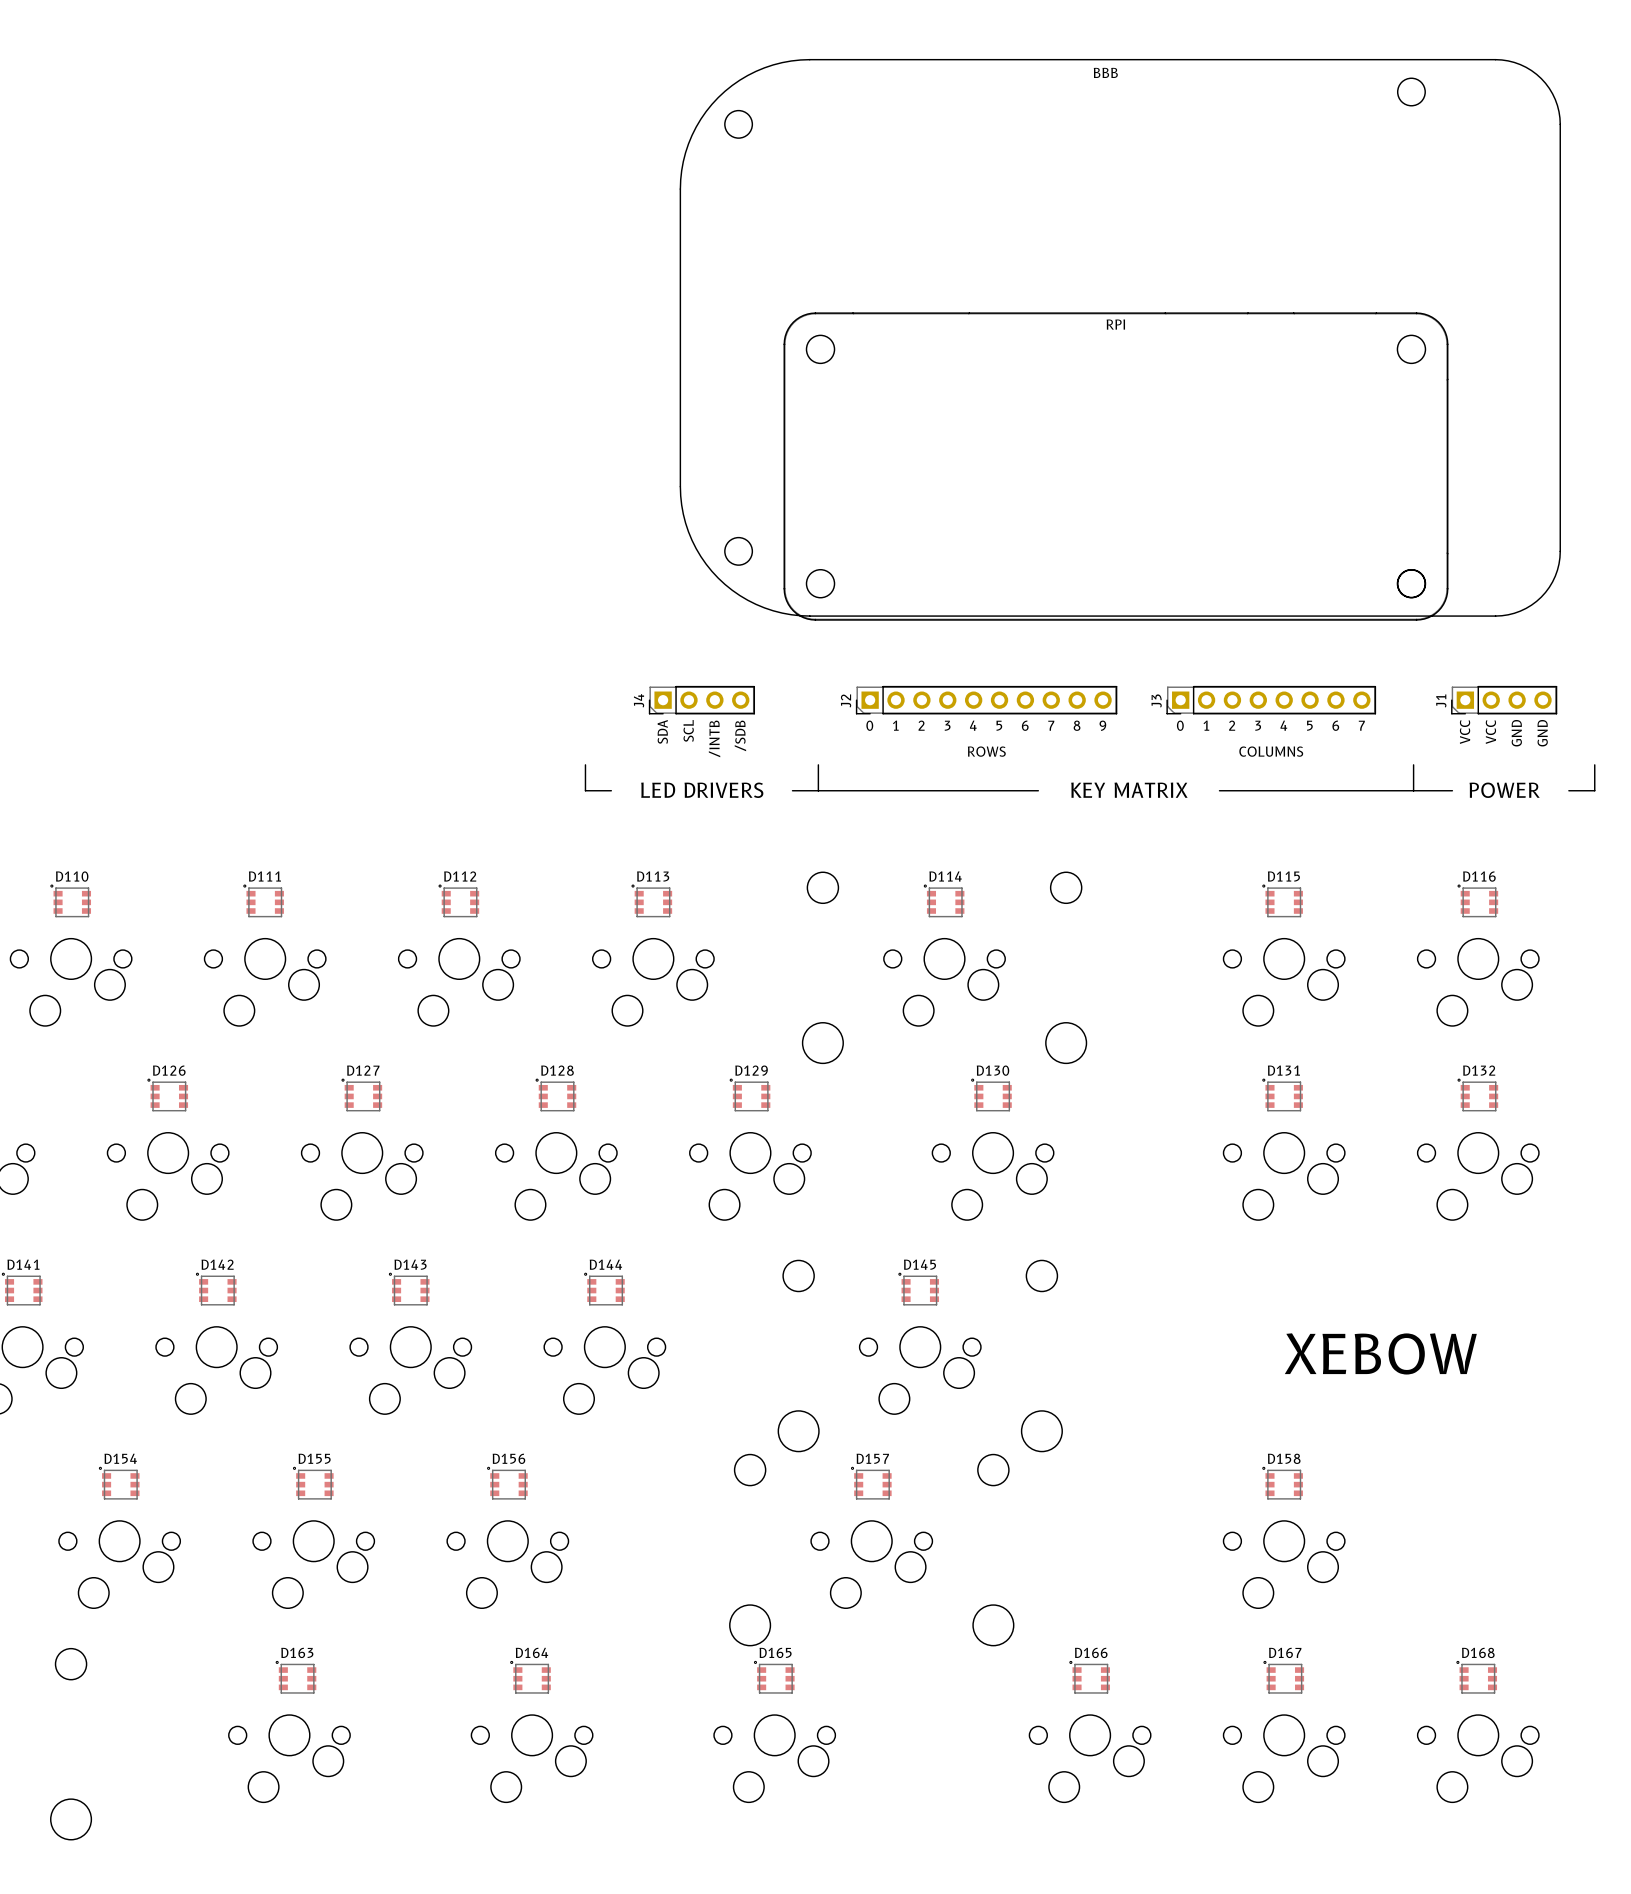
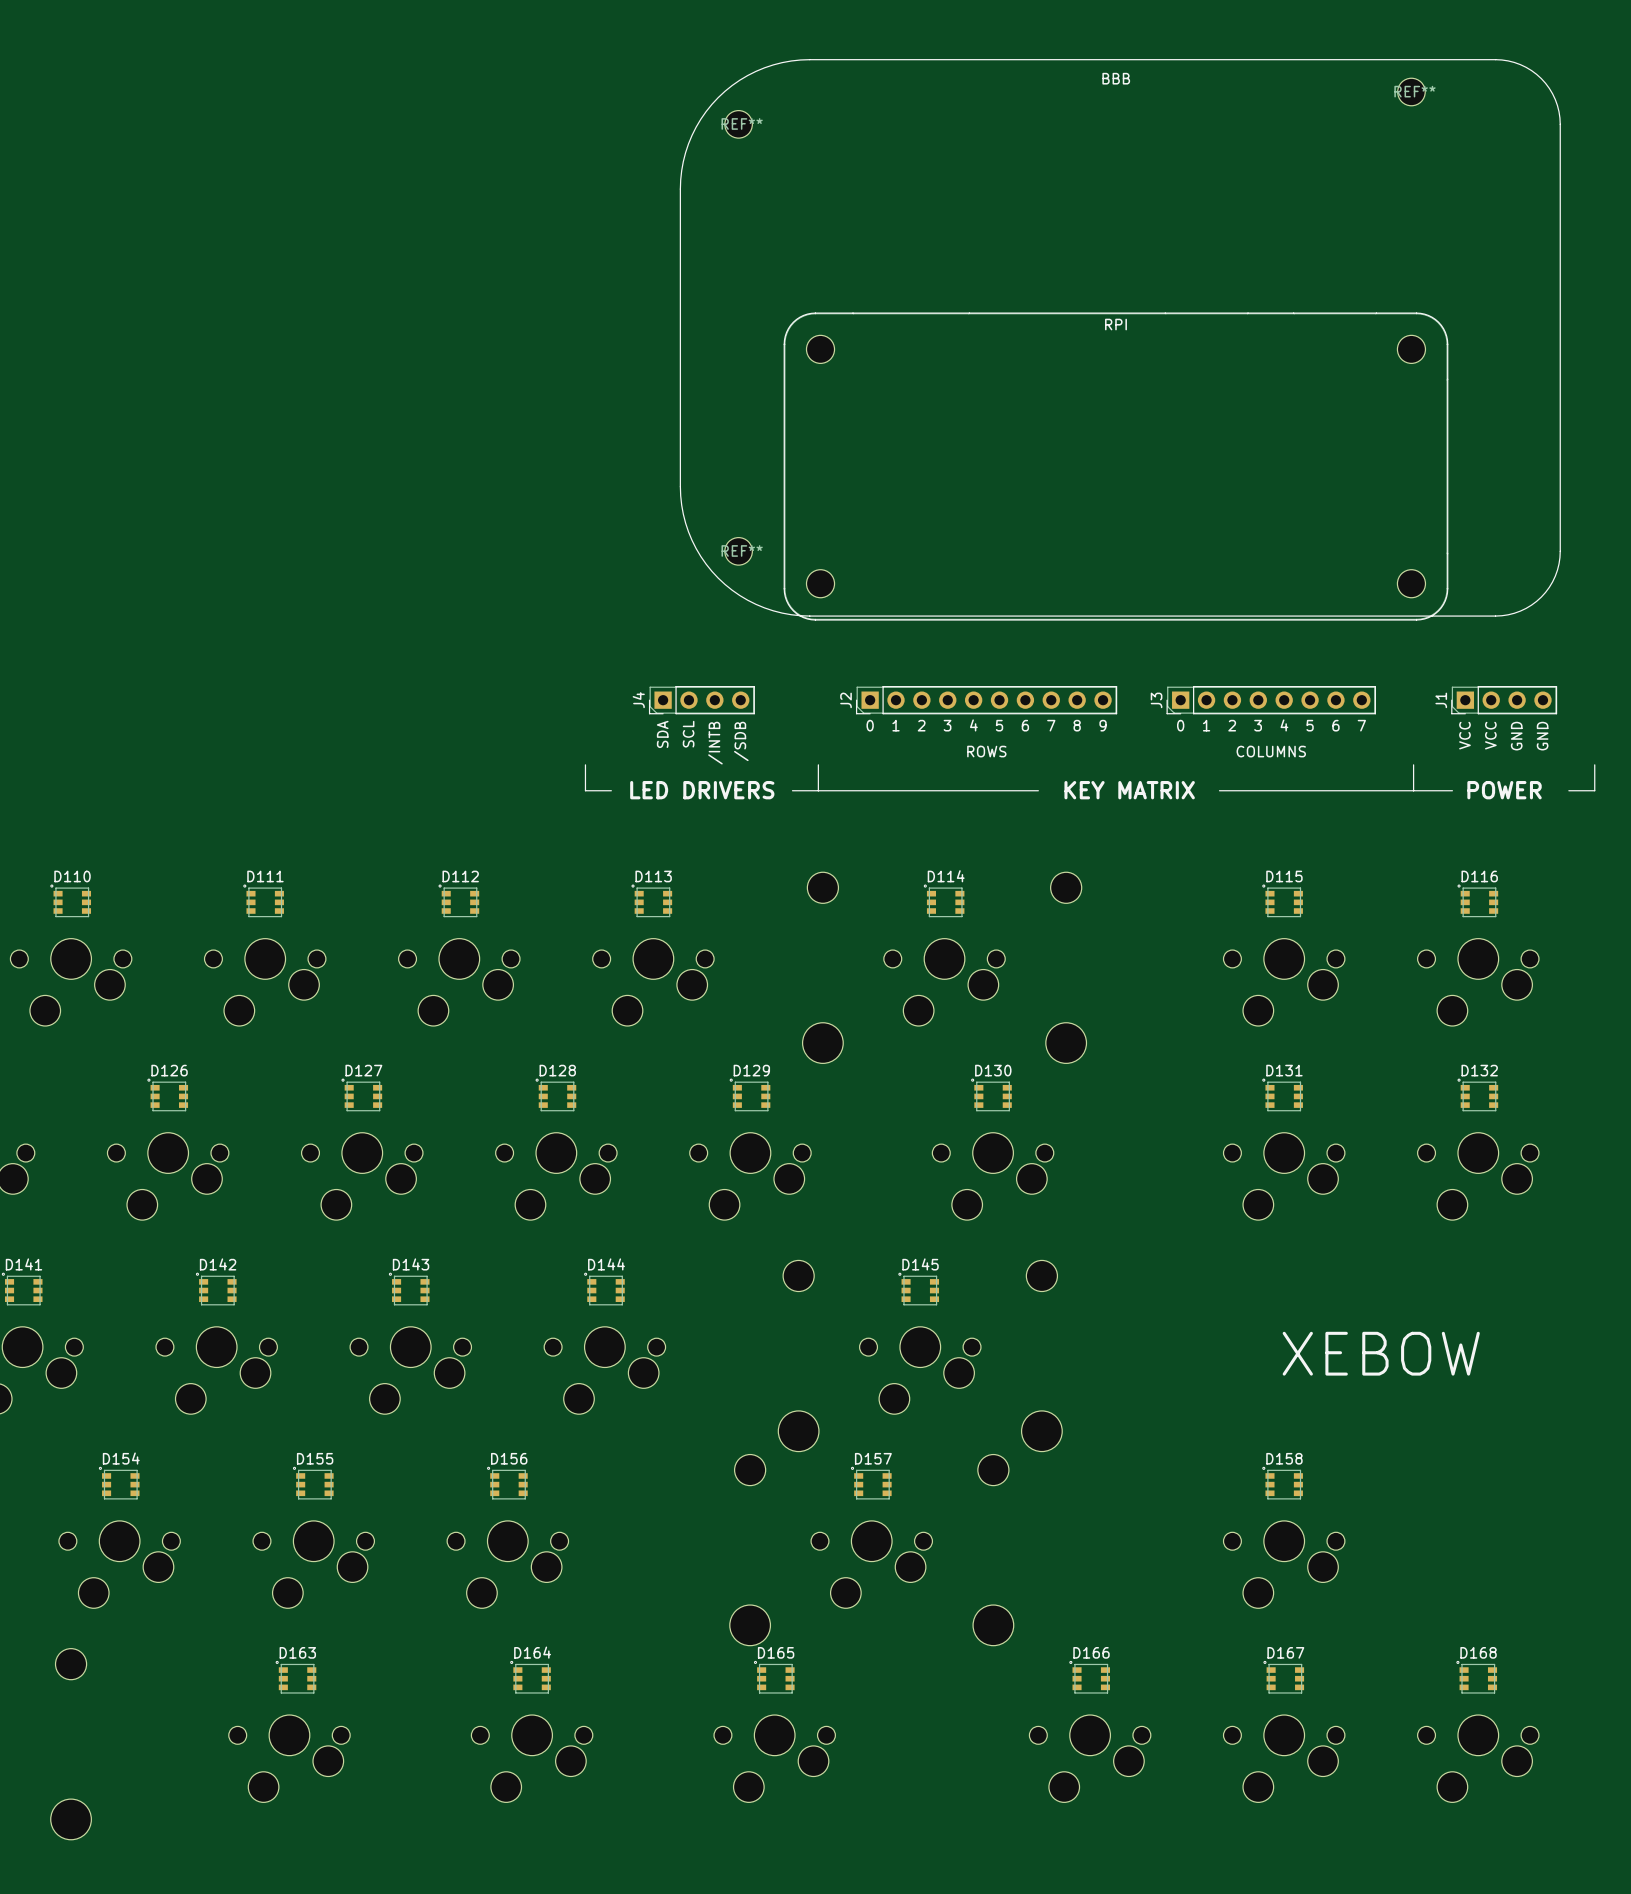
text: none -> BBB (1116, 78)
REF**: none -> (1411, 92)
REF**: none -> (738, 124)
BBB: (1120, 337) -> none
REF**: none -> (738, 551)

